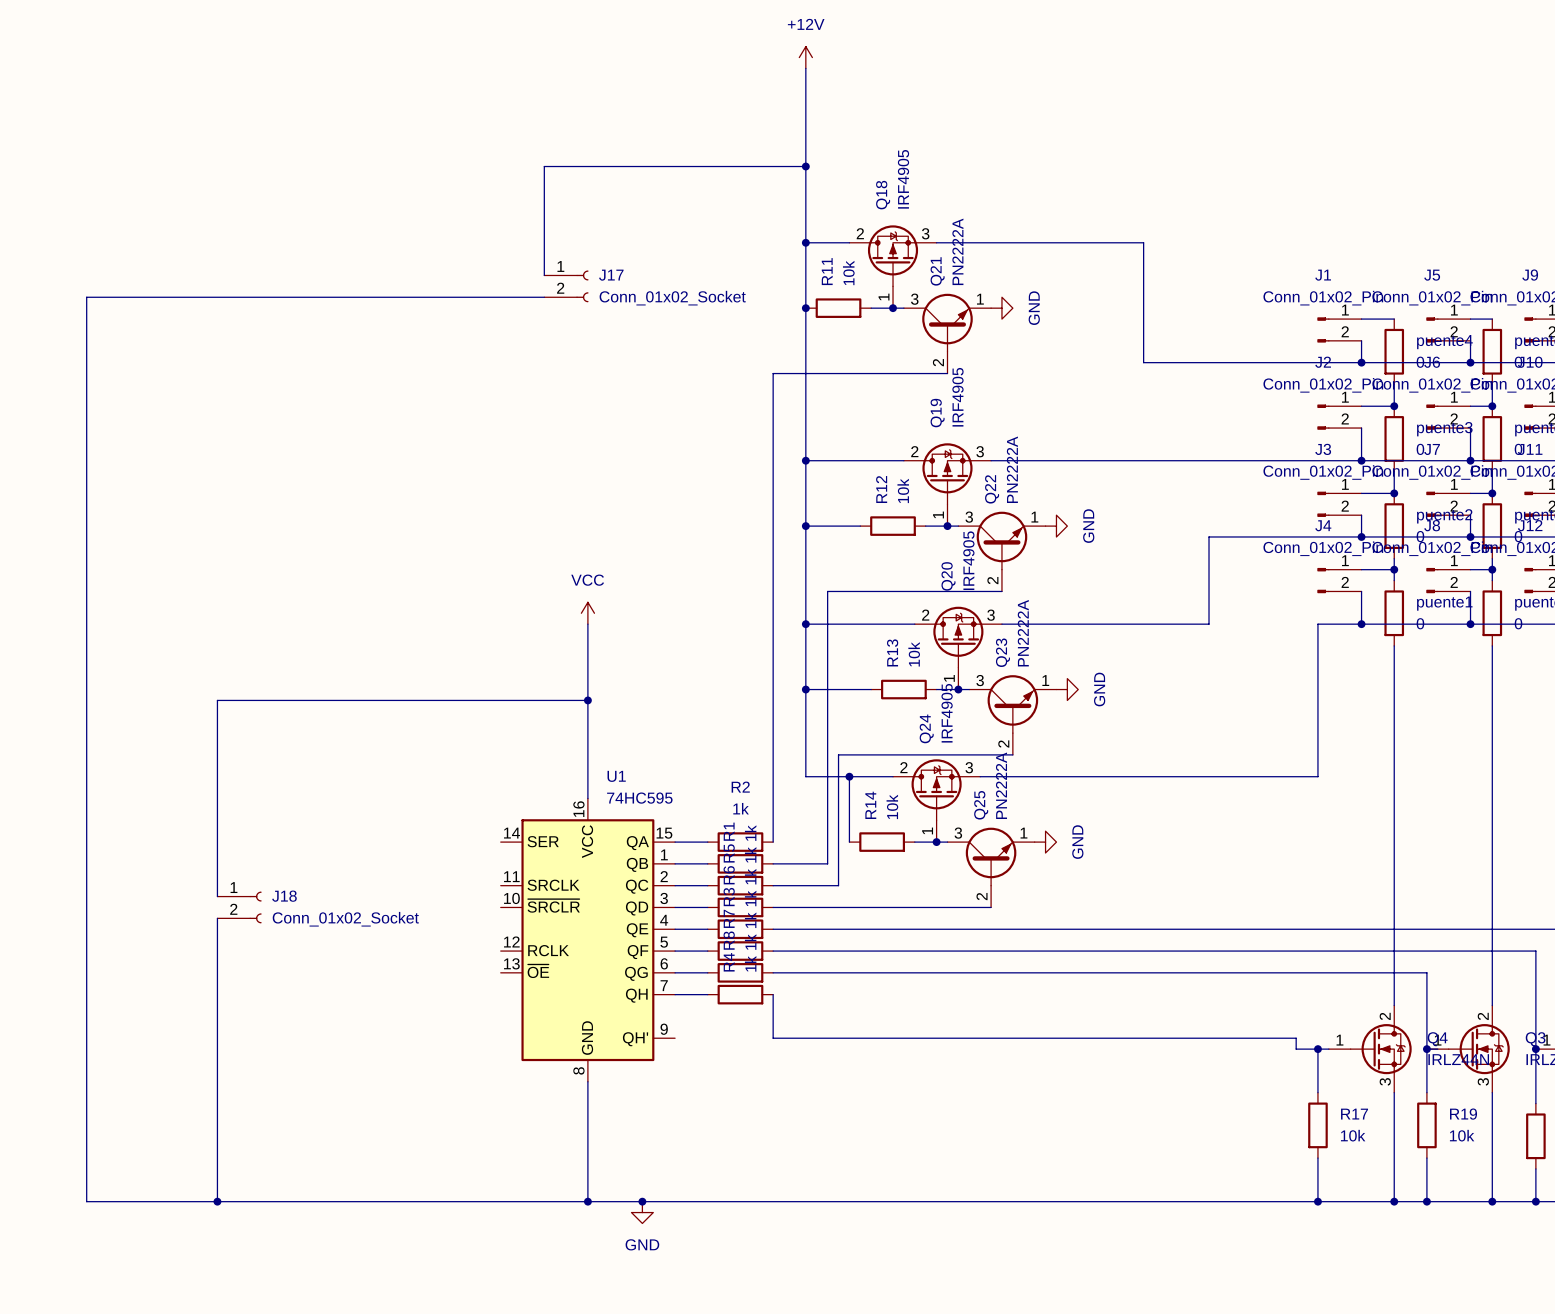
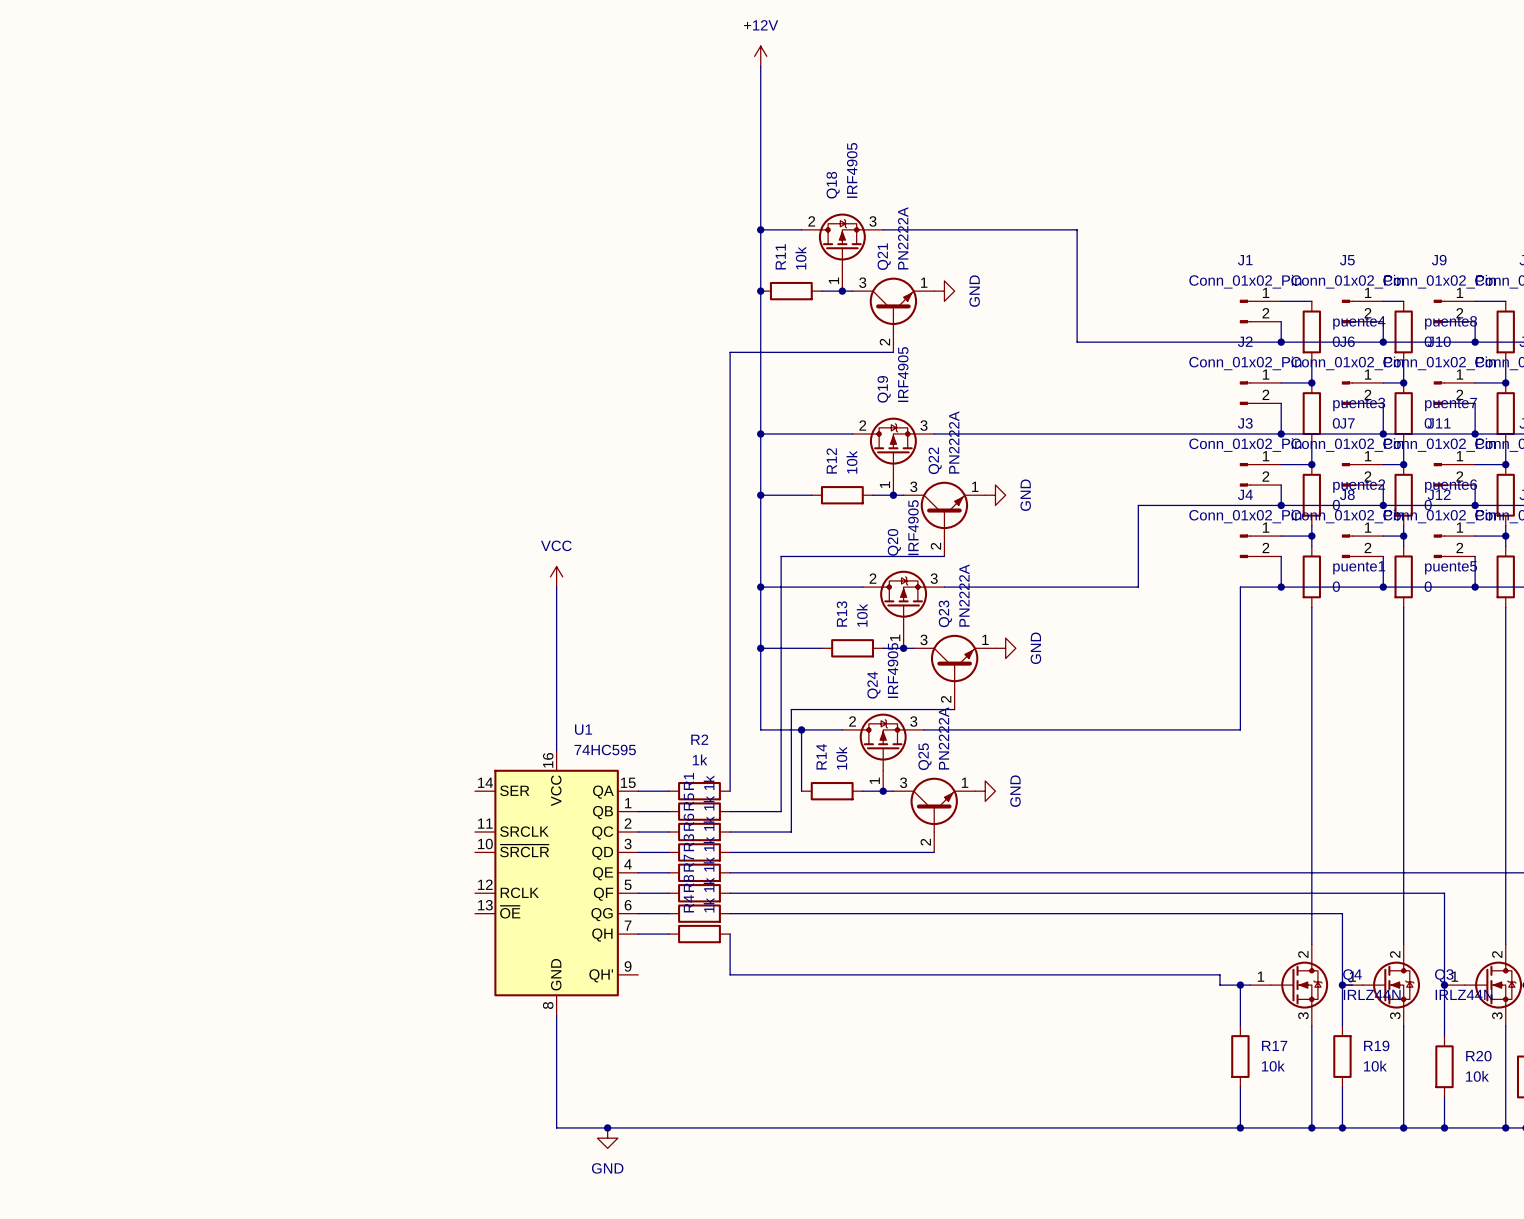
wire: (805, 166) (544, 166) (544, 275) -> none
junction: (805, 166) -> none
J17: Conn_01x02_Socket (566, 286) -> none
wire: (544, 297) (86, 297) (86, 1201) (587, 1201) -> none
wire: (587, 700) (217, 700) (217, 896) -> none
junction: (587, 700) -> none
J18: Conn_01x02_Socket (239, 907) -> none
wire: (217, 918) (217, 1201) -> none
junction: (217, 1201) -> none
junction: (587, 1201) -> none

